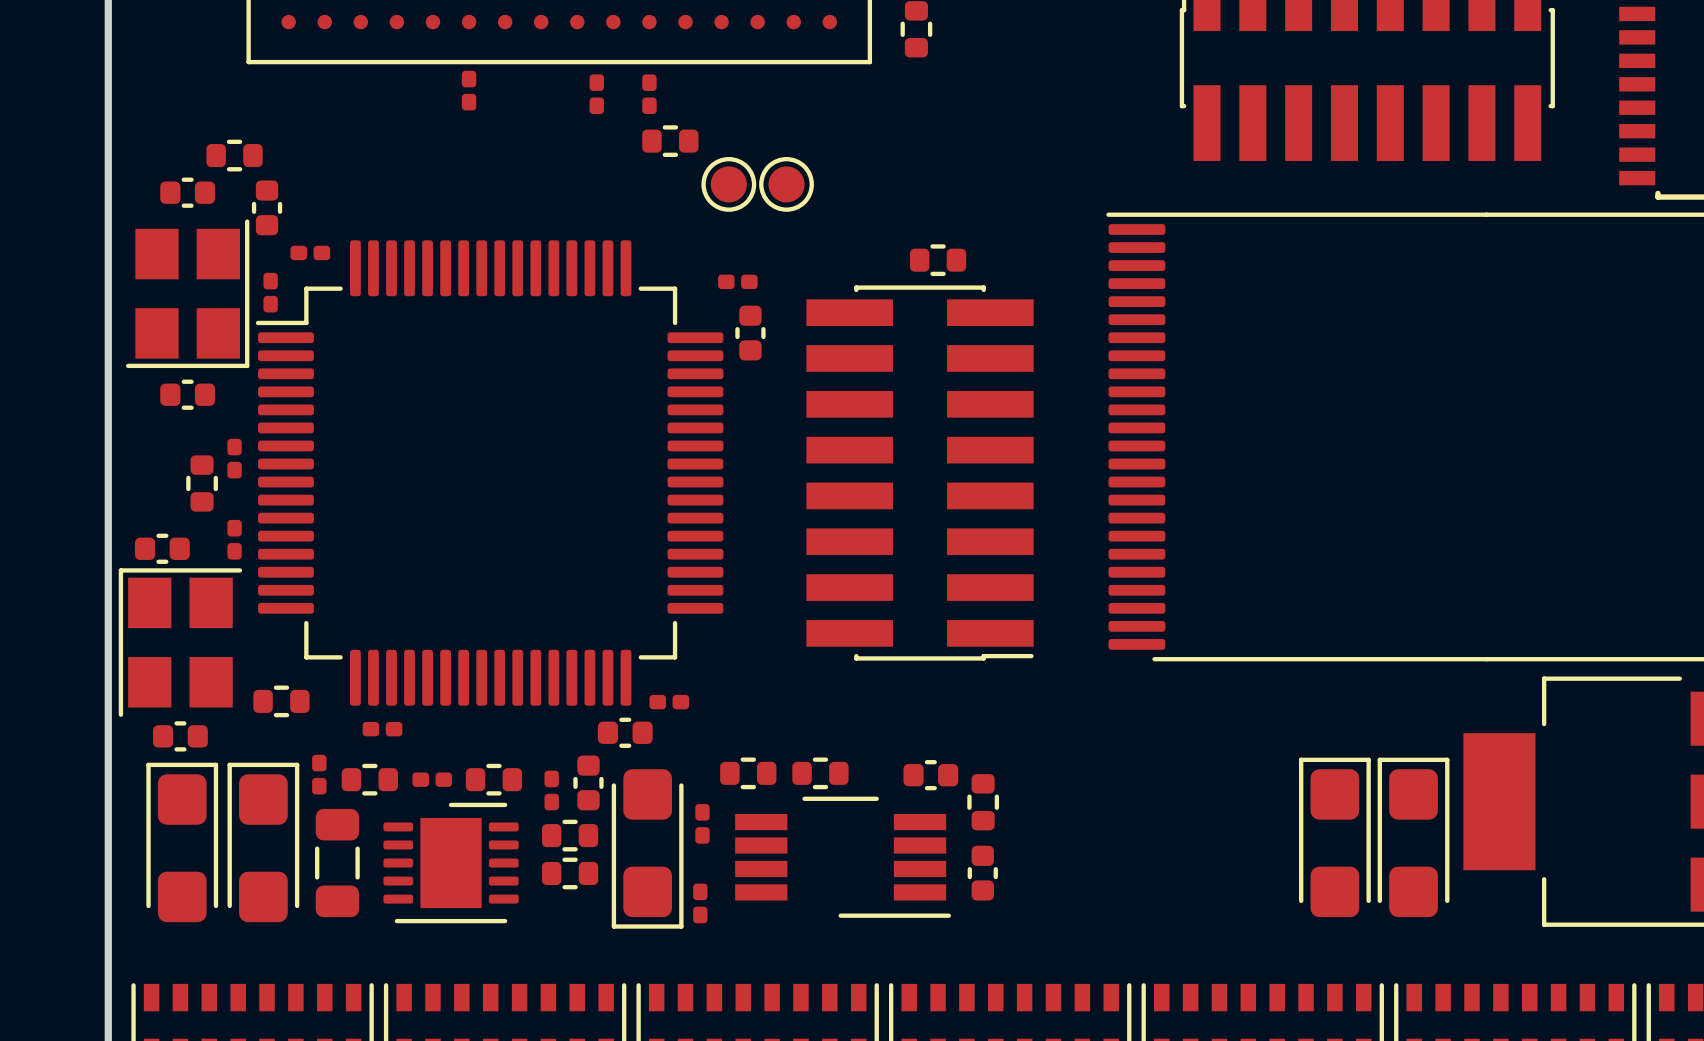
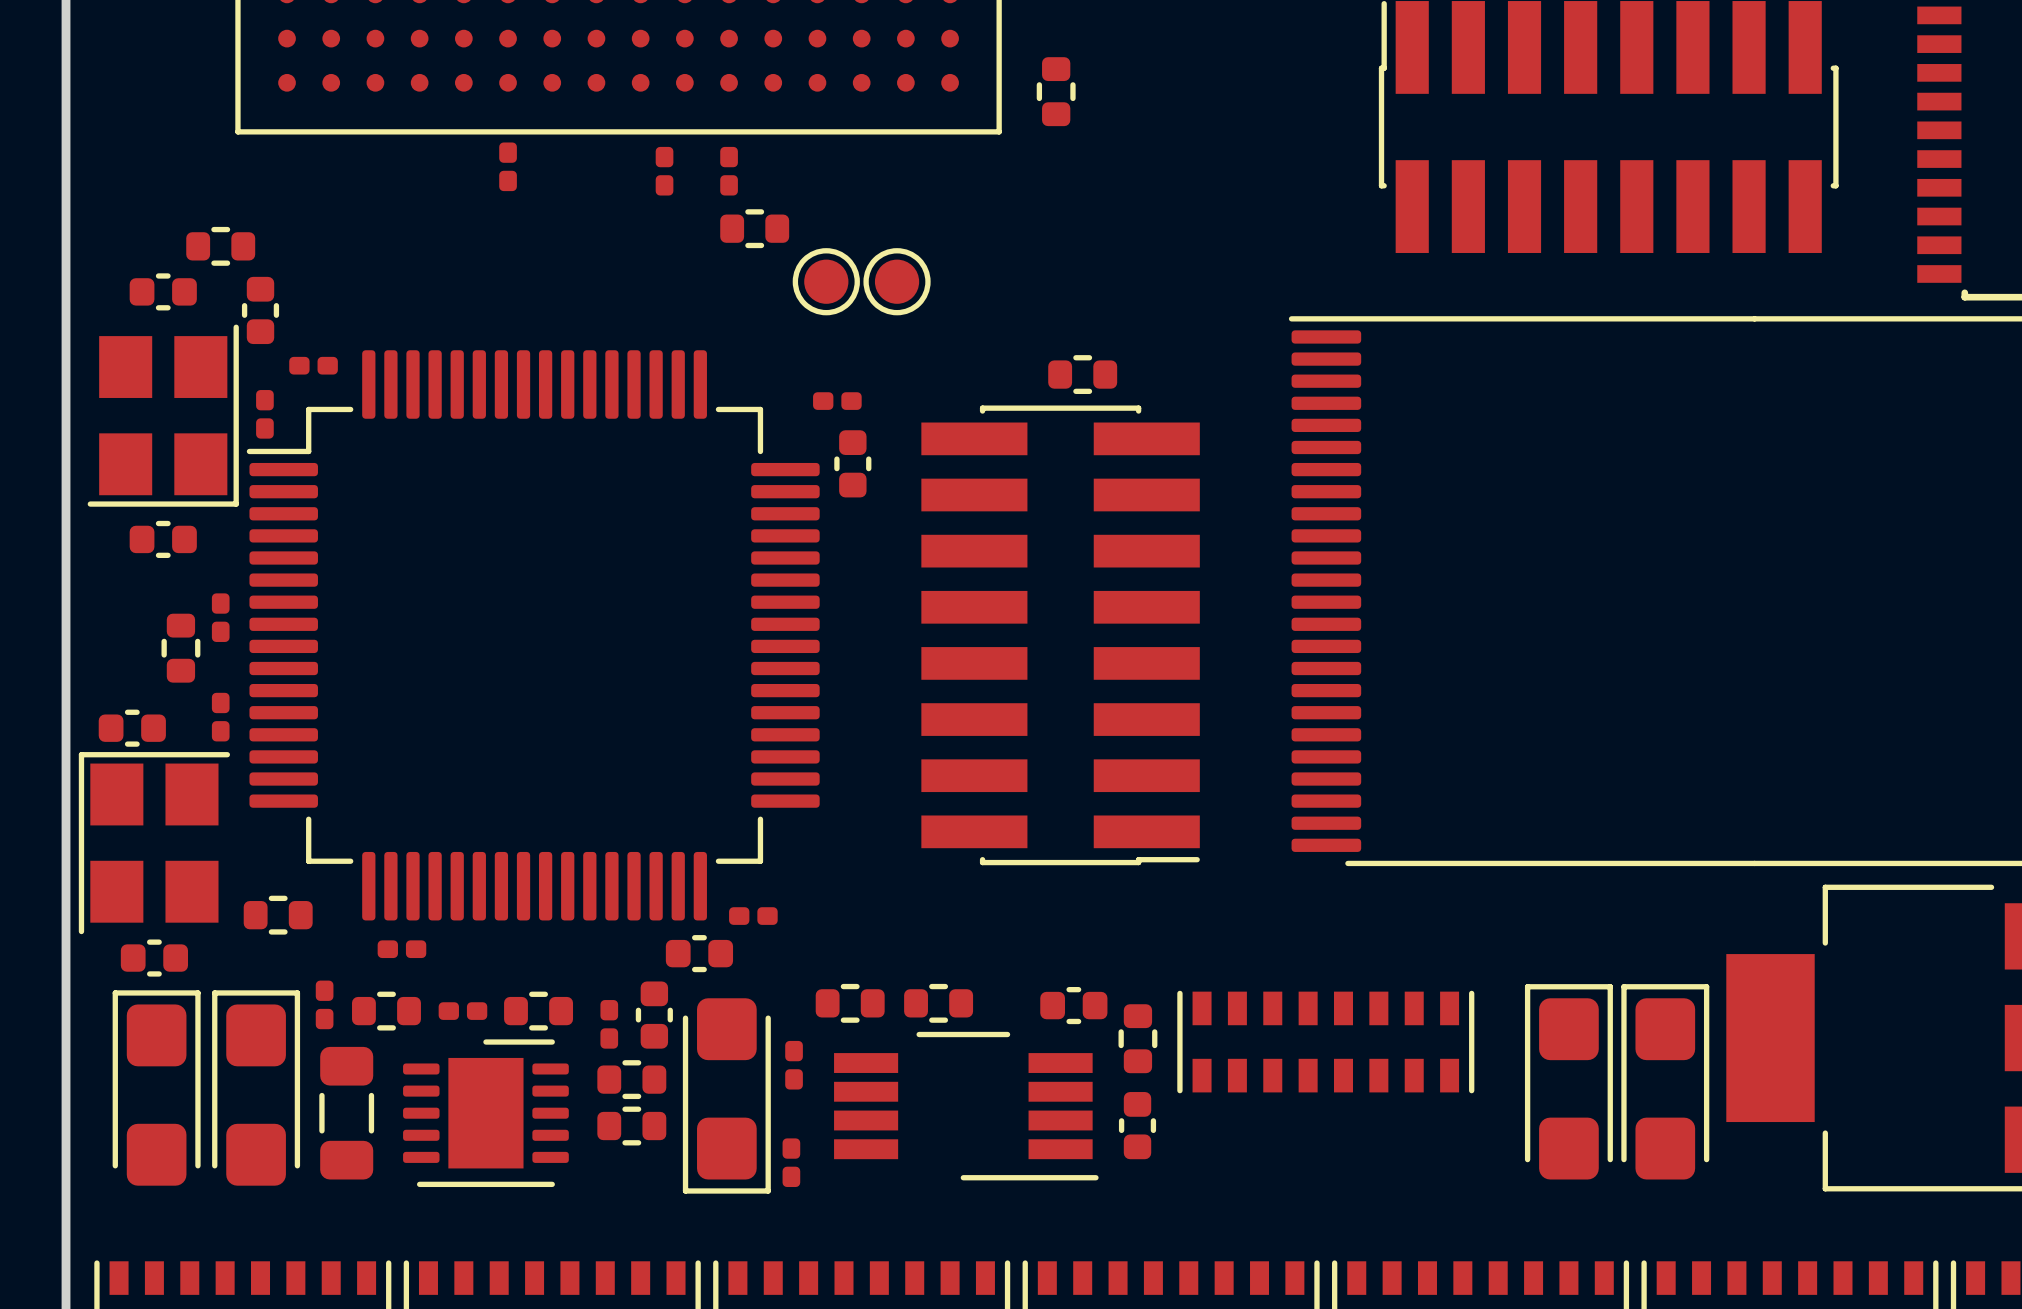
part: none -> (1325, 1042)

